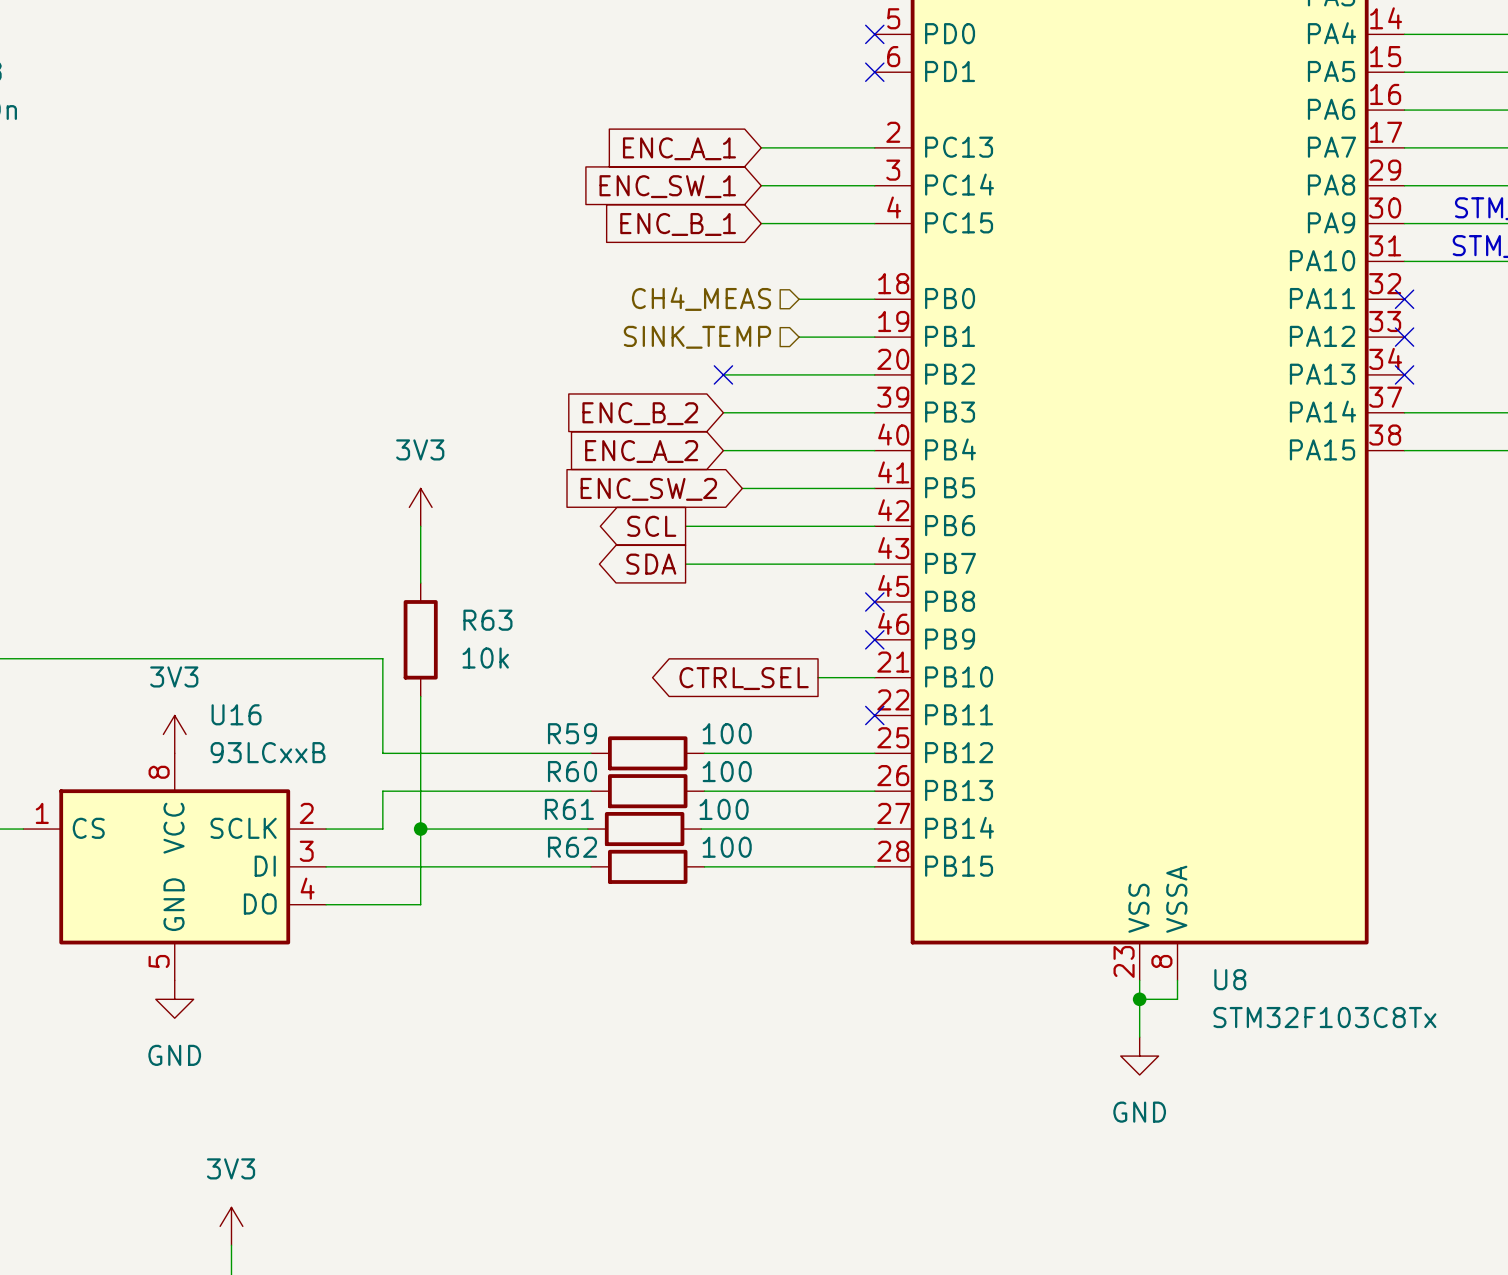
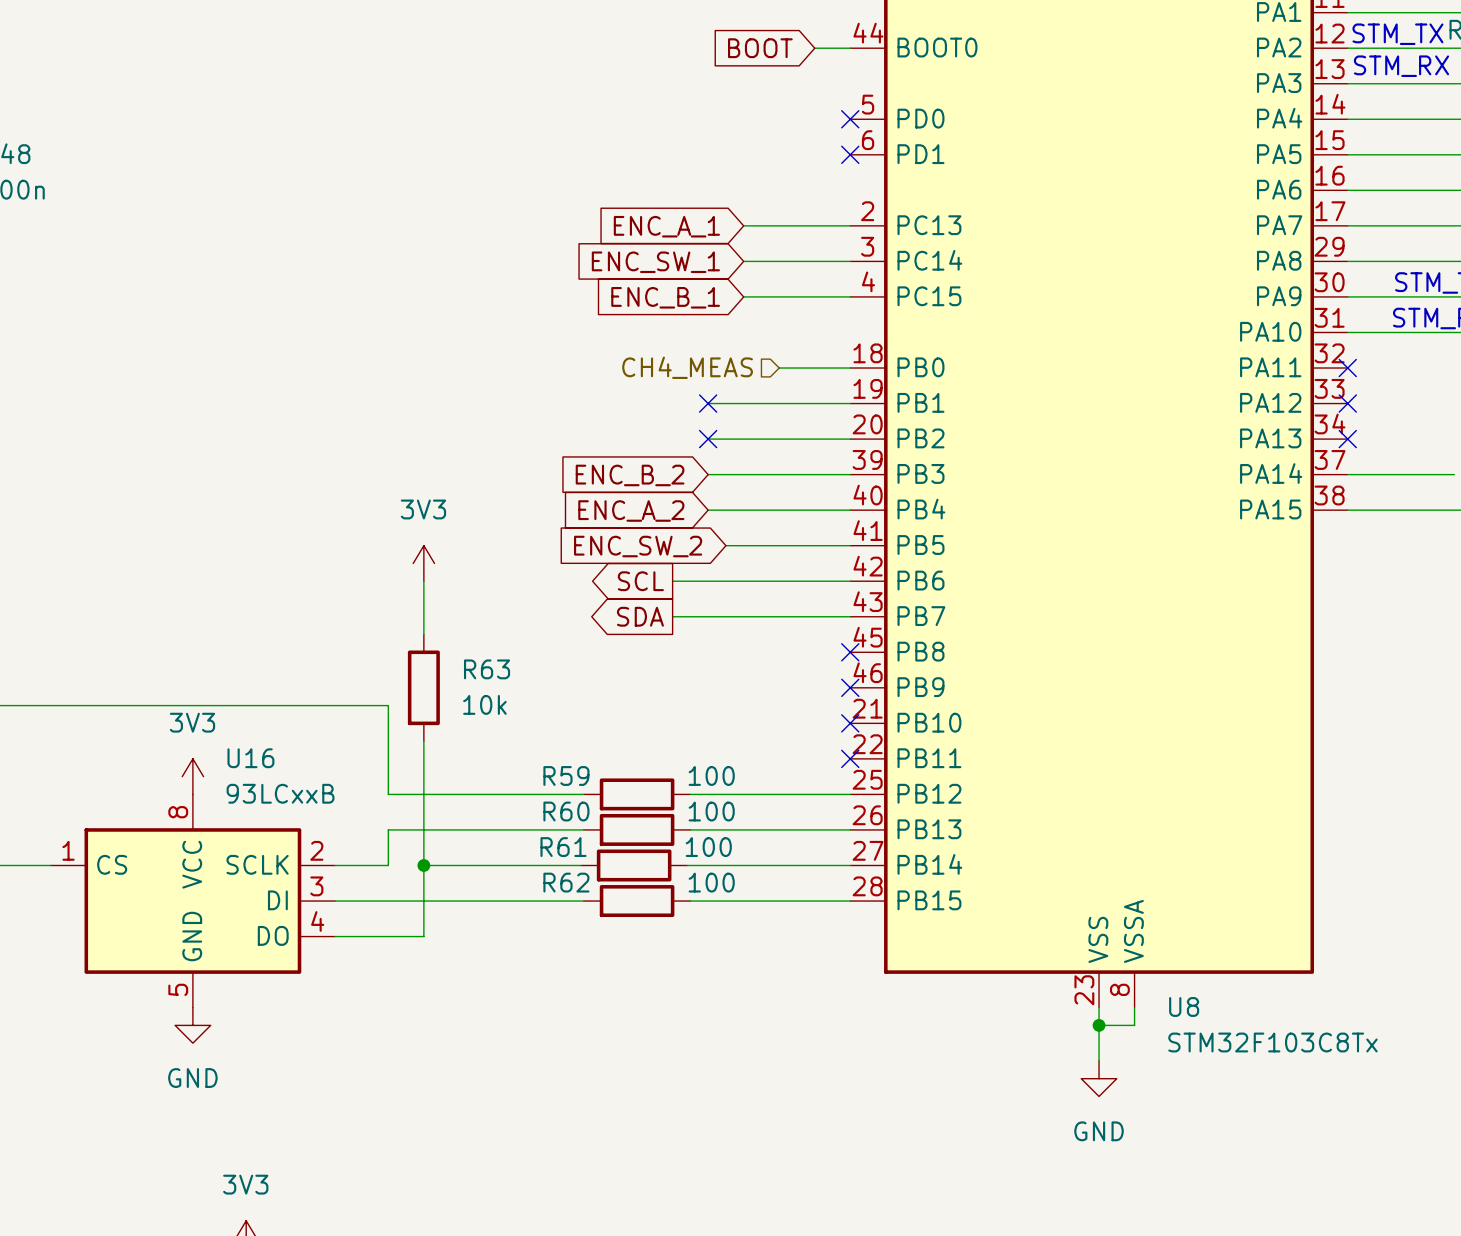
hierarchical label: SINK_TEMP (697, 337) -> none
wire: none -> (708, 403) (779, 403)
no-connect mark: none -> (708, 403)
wire: (818, 677) (874, 677) -> none
no-connect mark: none -> (850, 723)
global label: CTRL_SEL (744, 678) -> none

